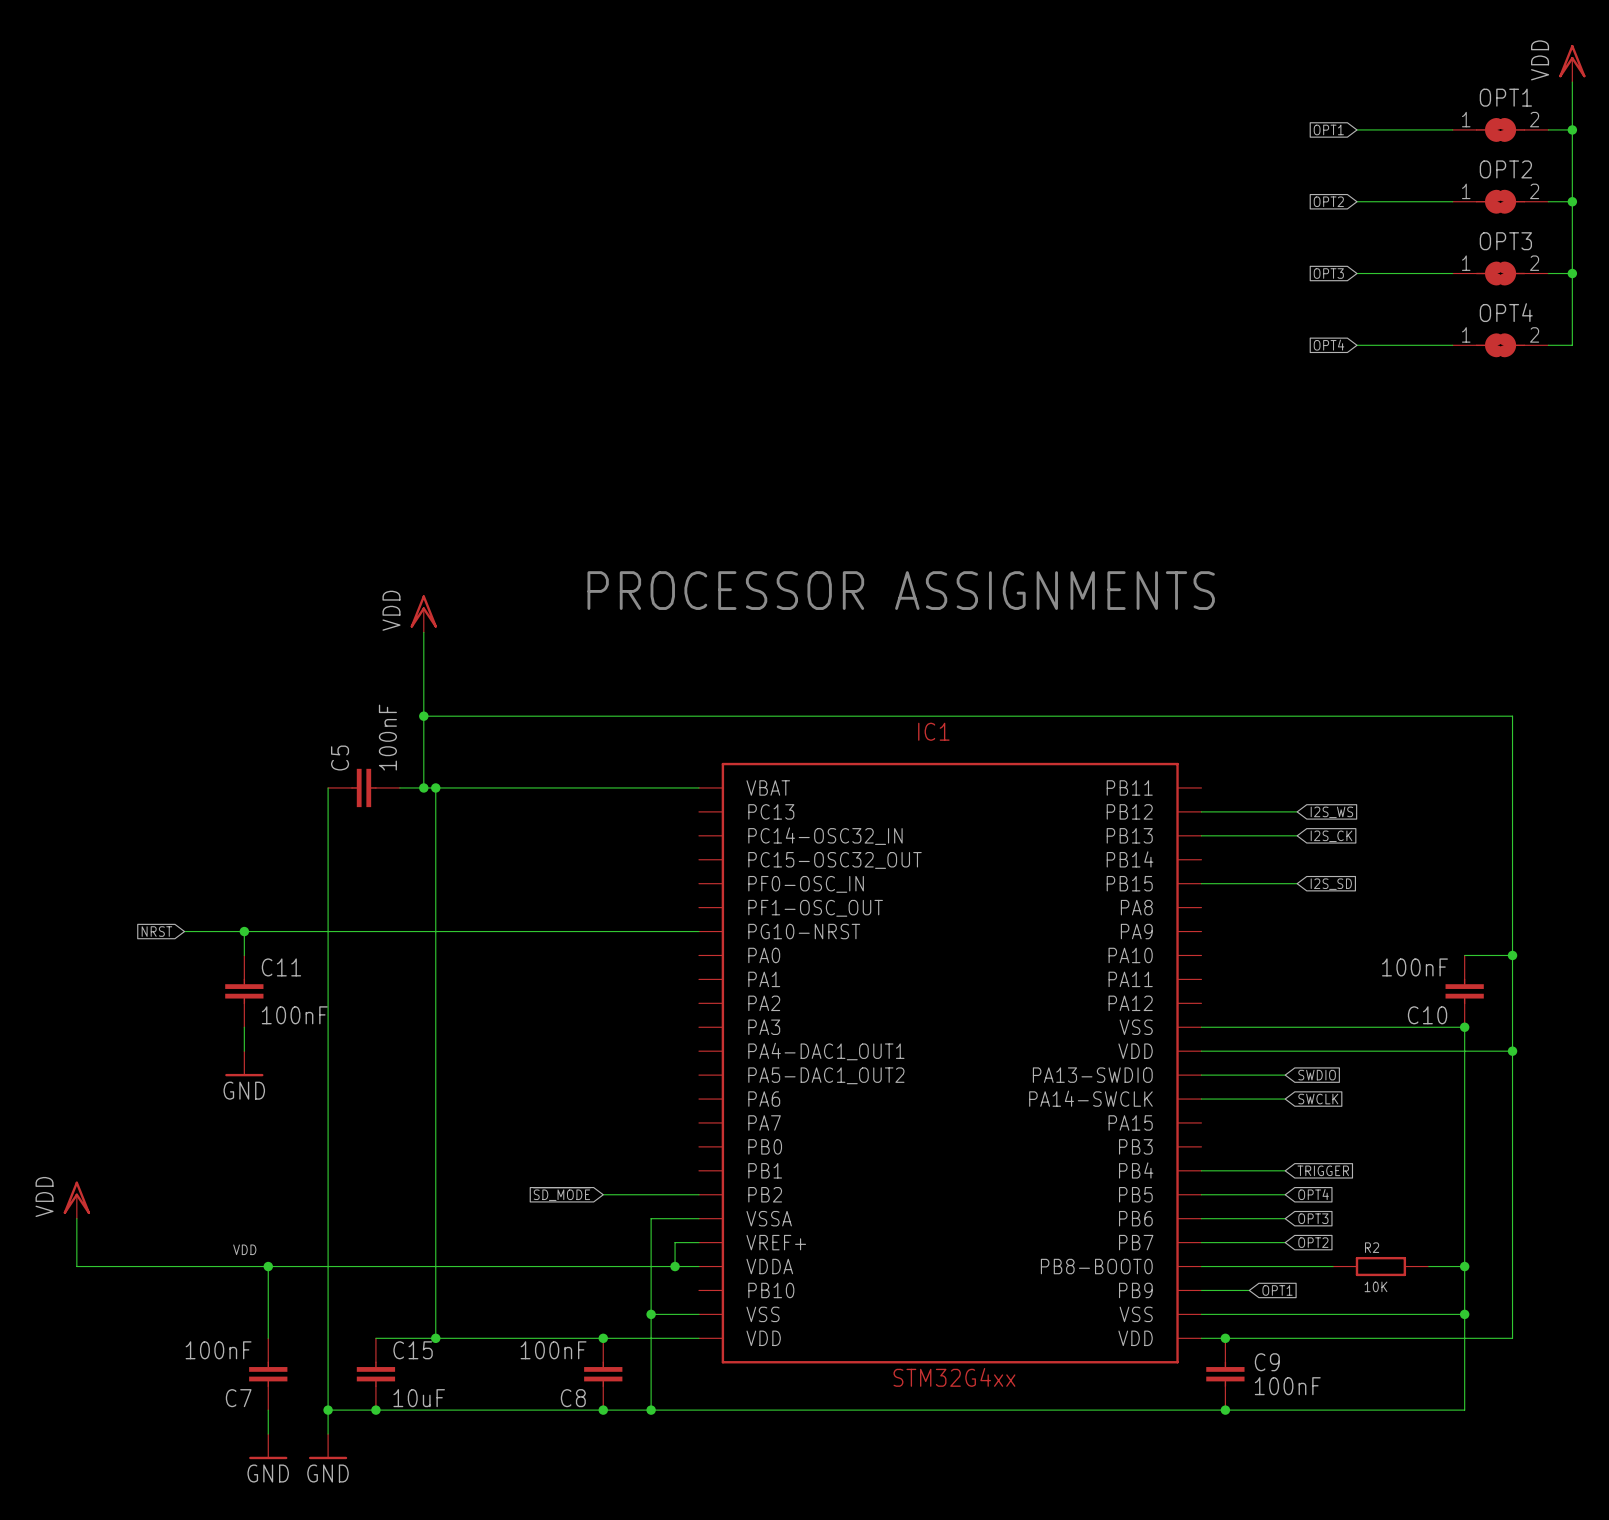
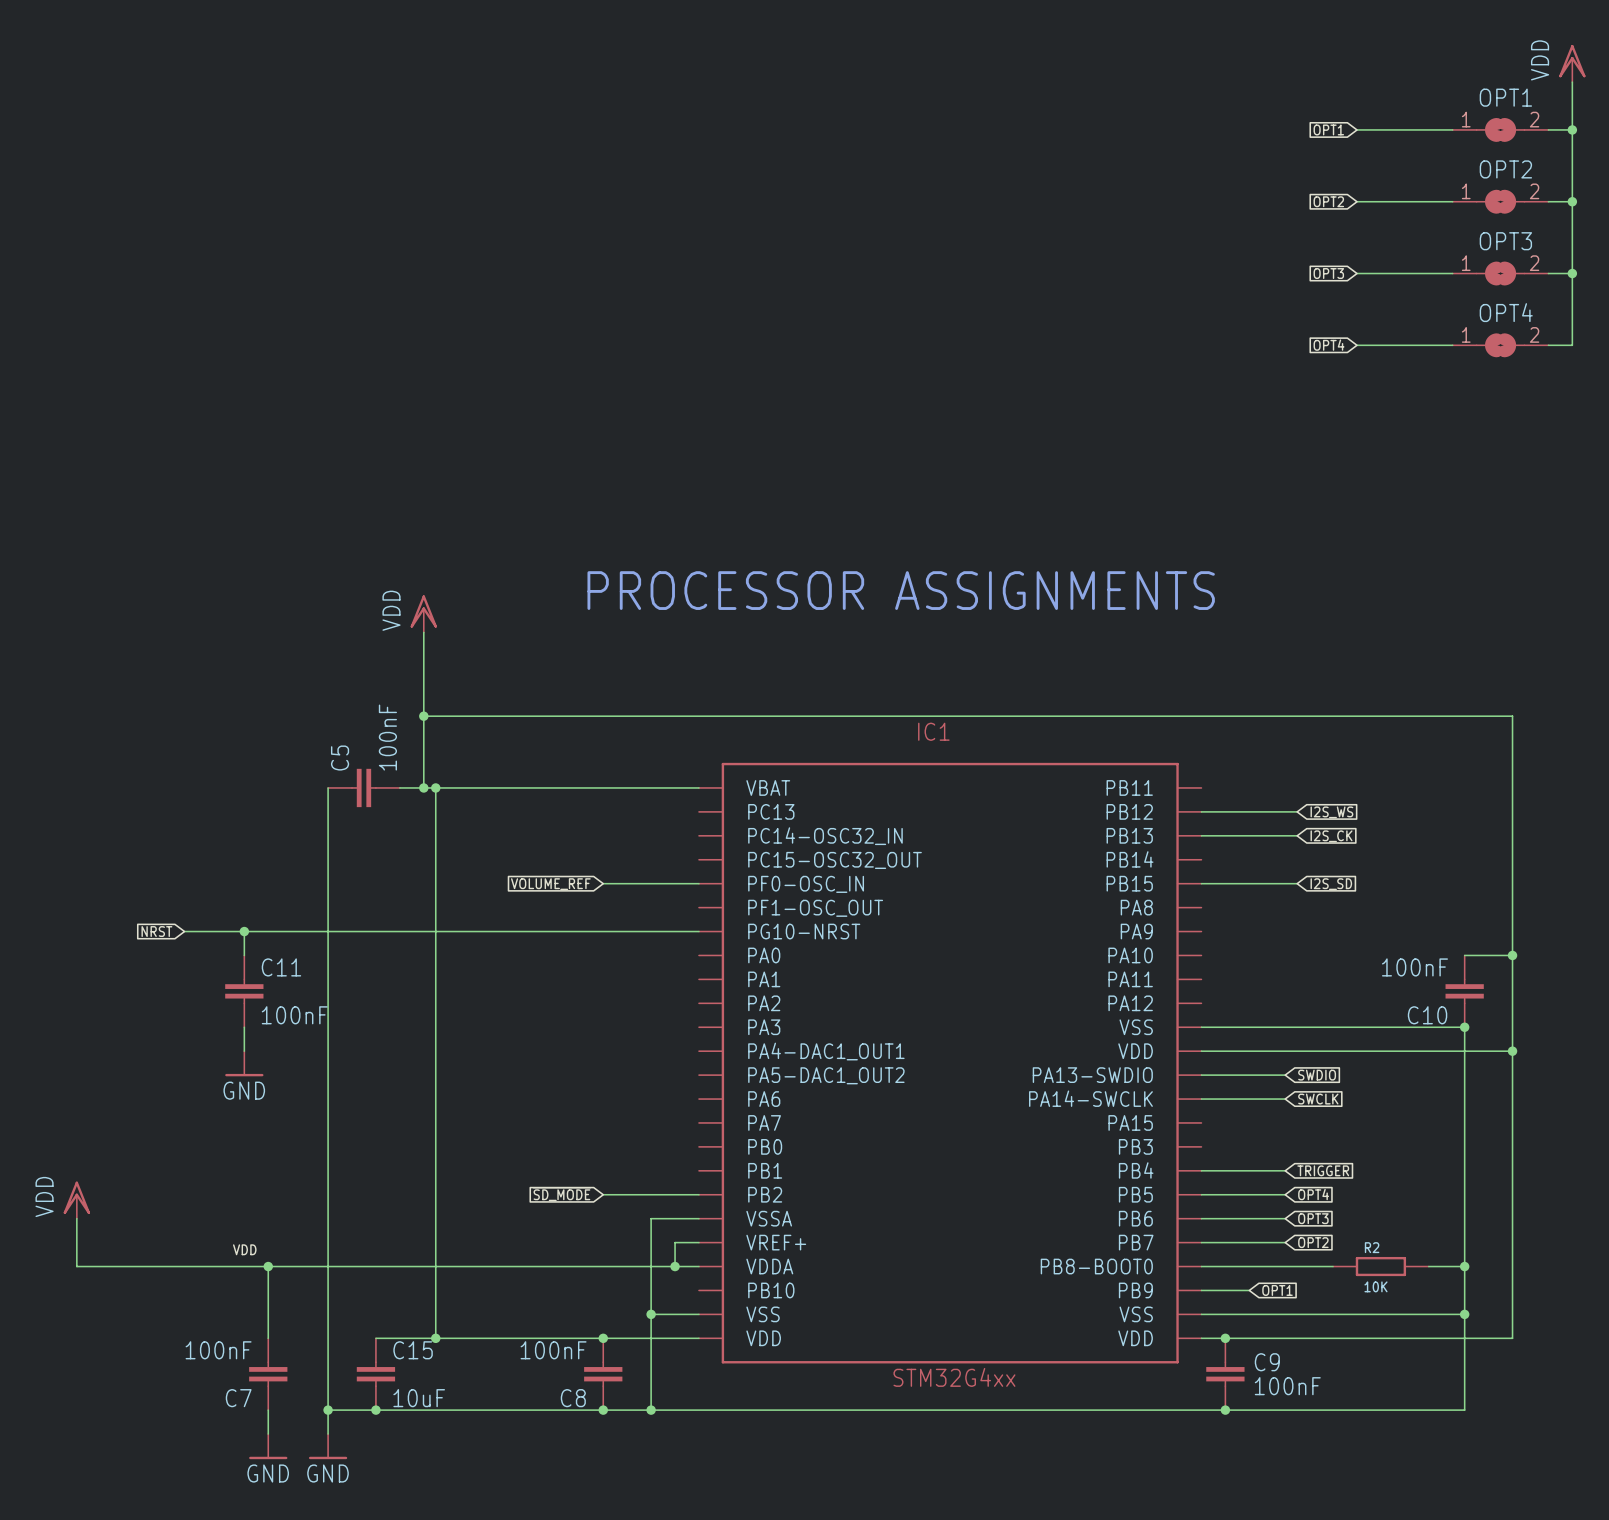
wire: none -> (603, 883) (698, 883)
global label: none -> VOLUME_REF (550, 884)

